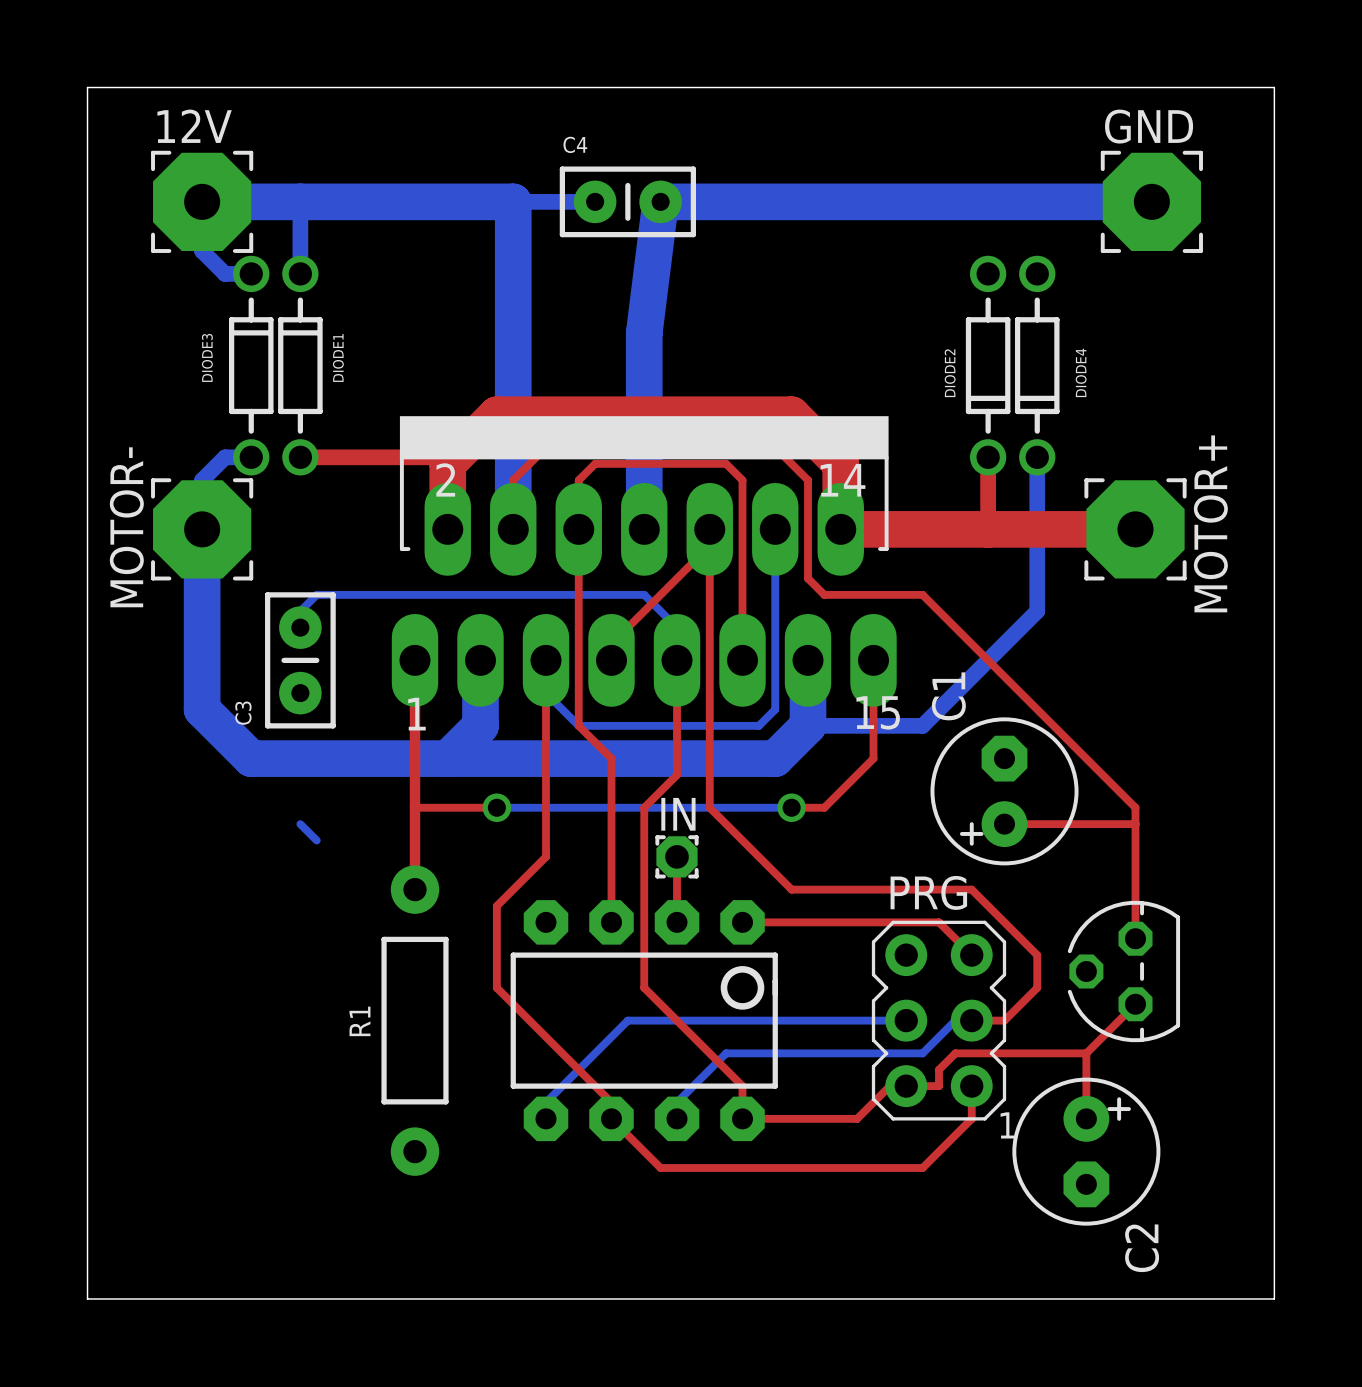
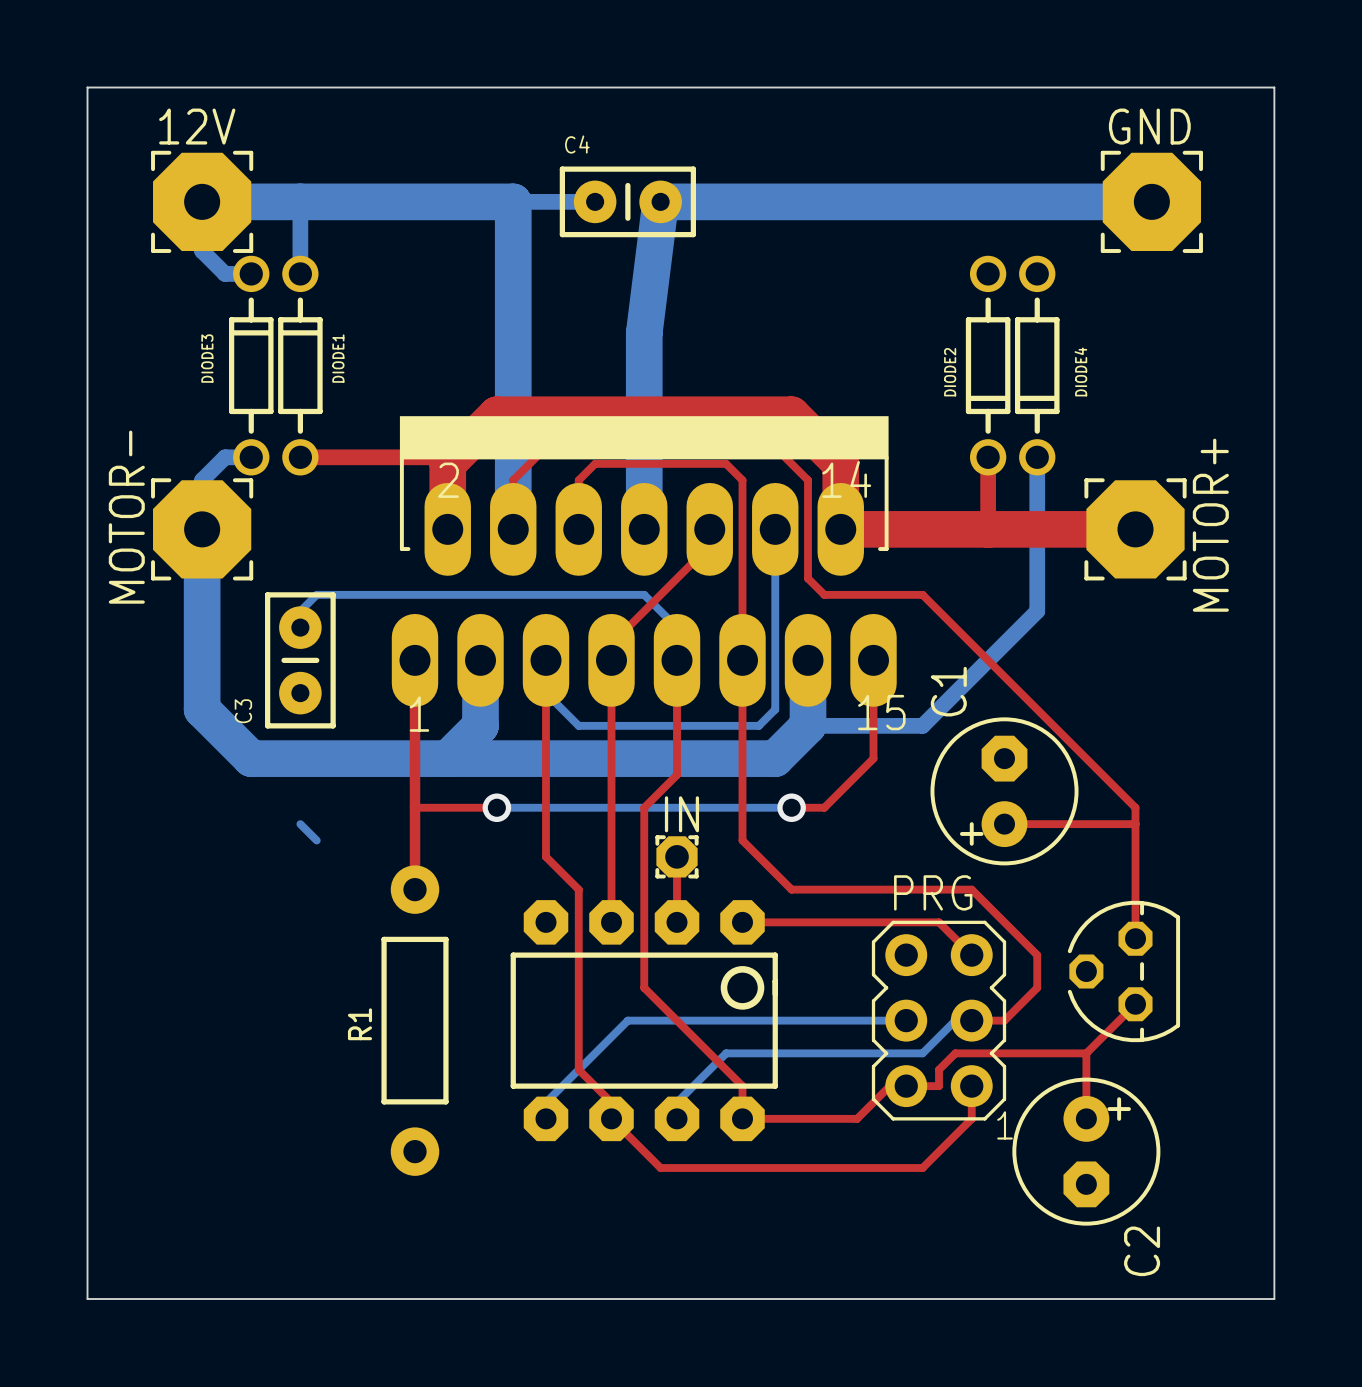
top track: (578, 529) (578, 725) (611, 758) -> (611, 660) (611, 758)
top track: (709, 545) (709, 807) (742, 840) -> (742, 660) (742, 840)
top track: (546, 856) (496, 906) (496, 987) (578, 1069) -> (546, 856) (578, 889) (578, 1069)

